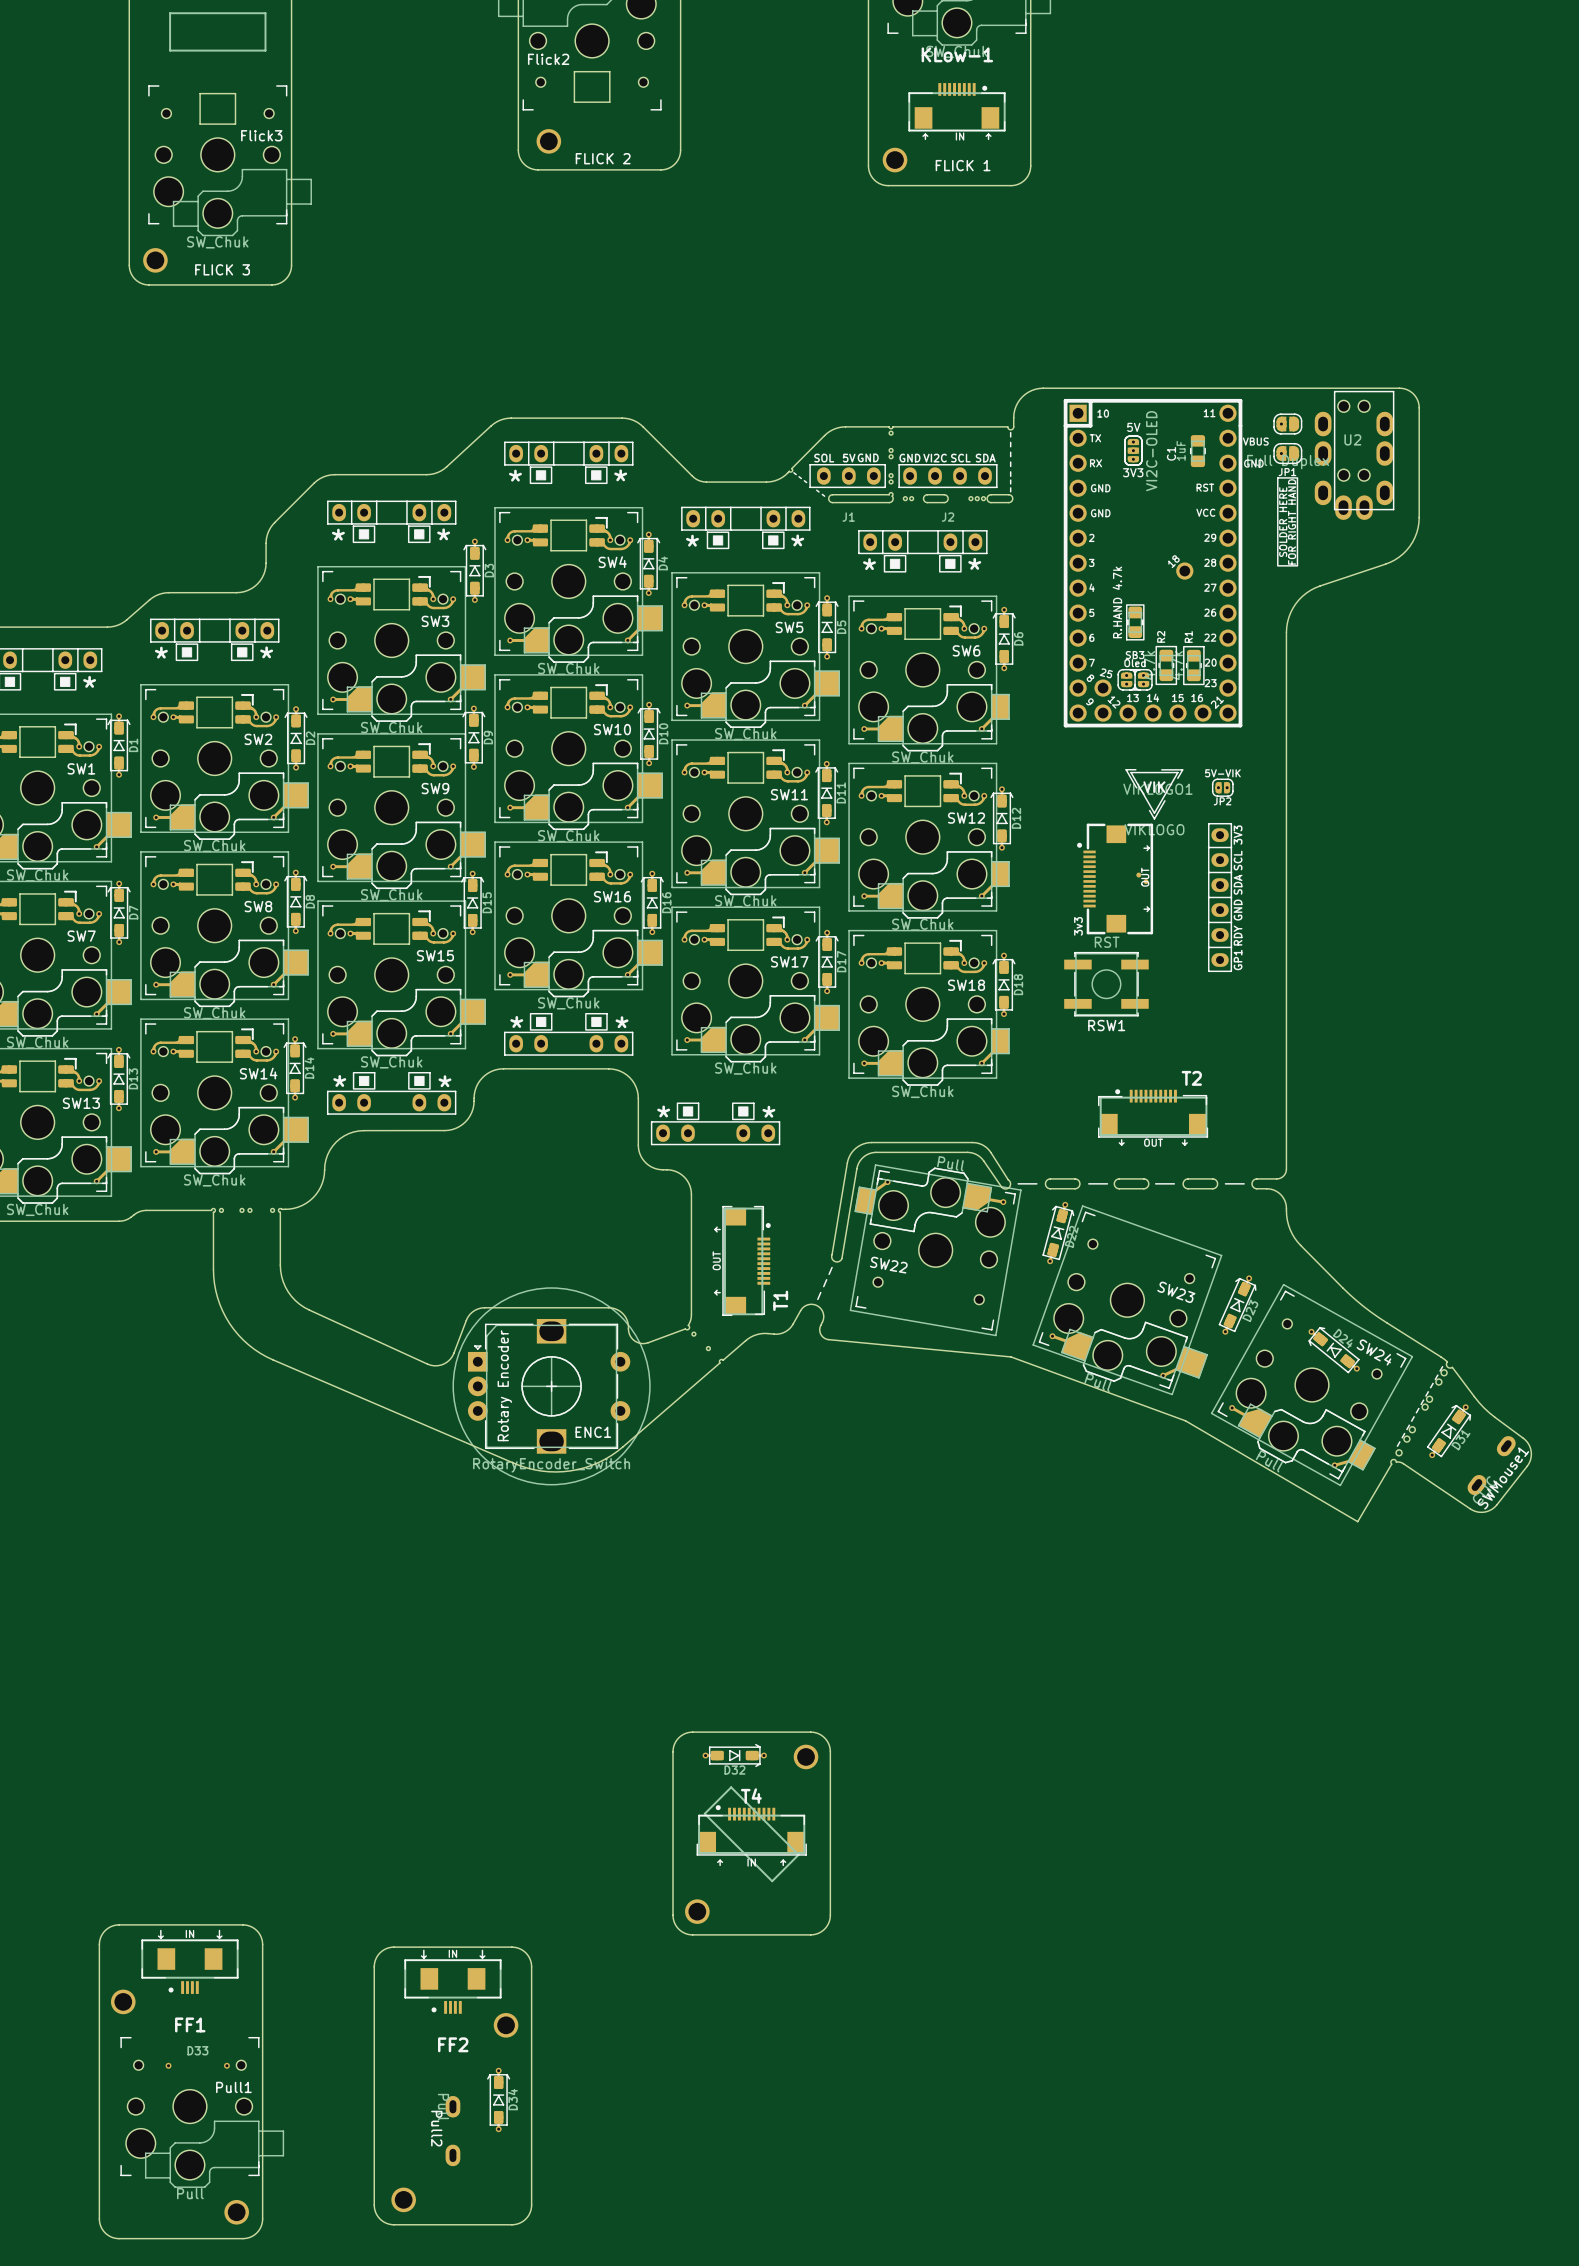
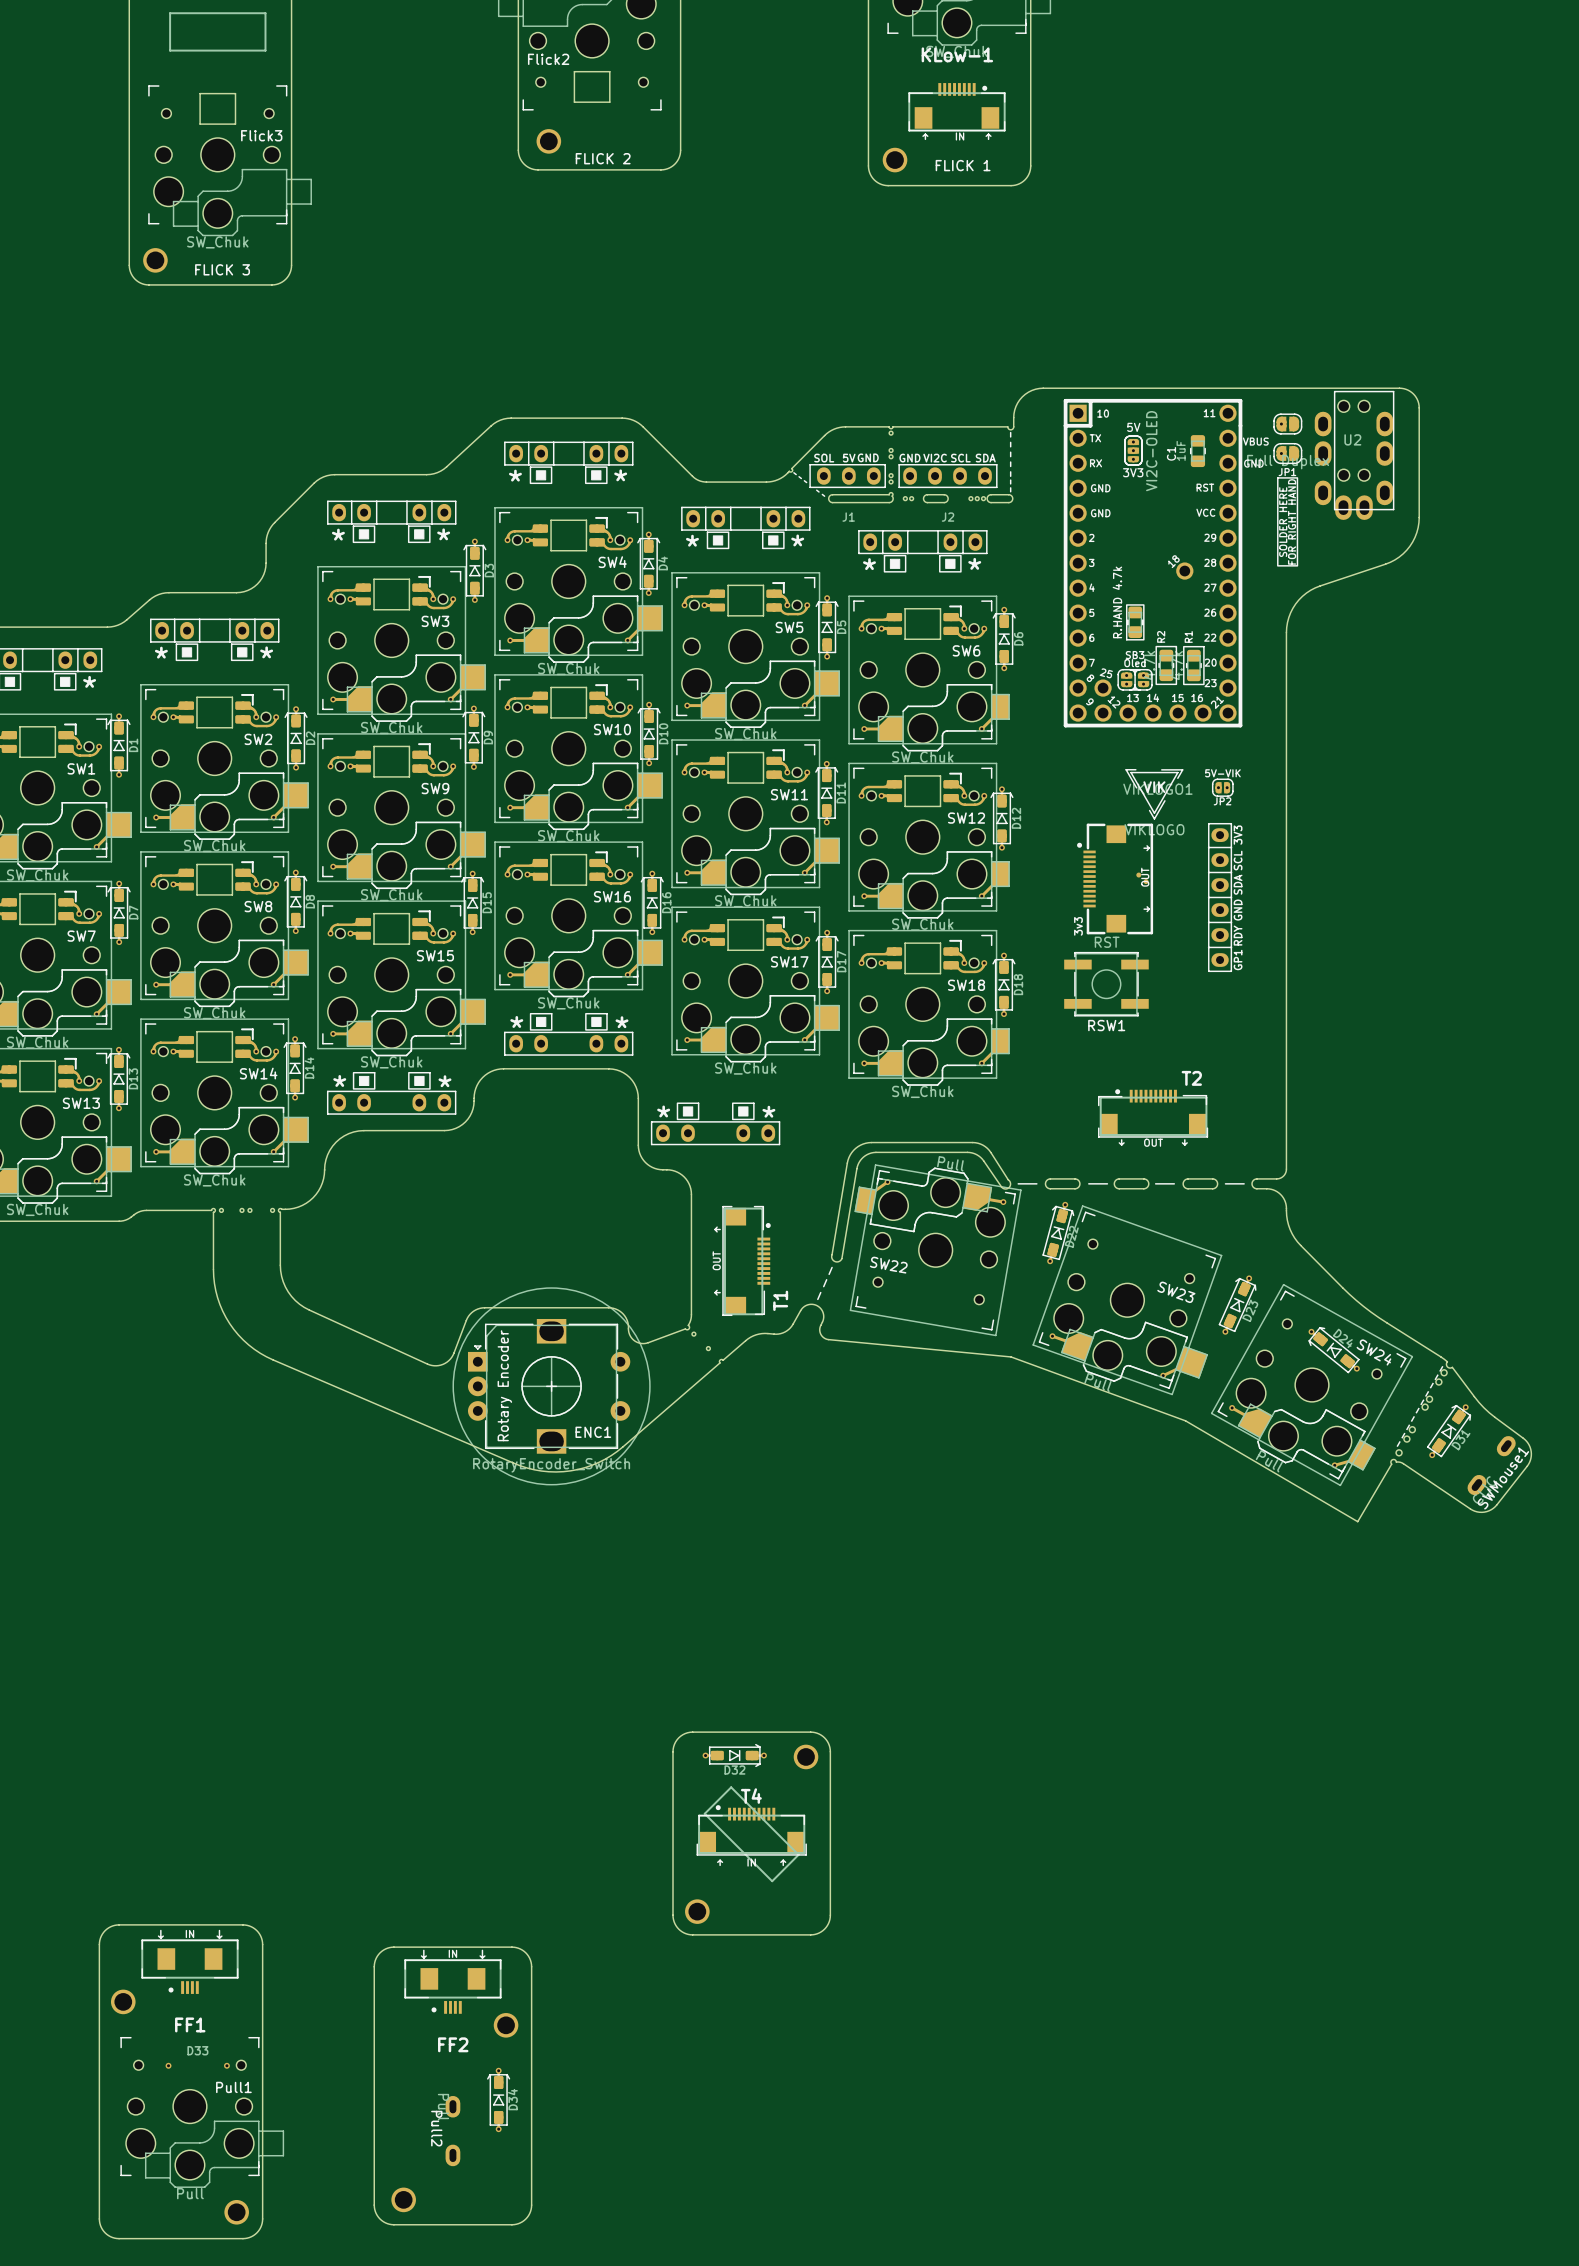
Pull1 footprint: [120, 2036, 284, 2188] -> [120, 2036, 284, 2188]

